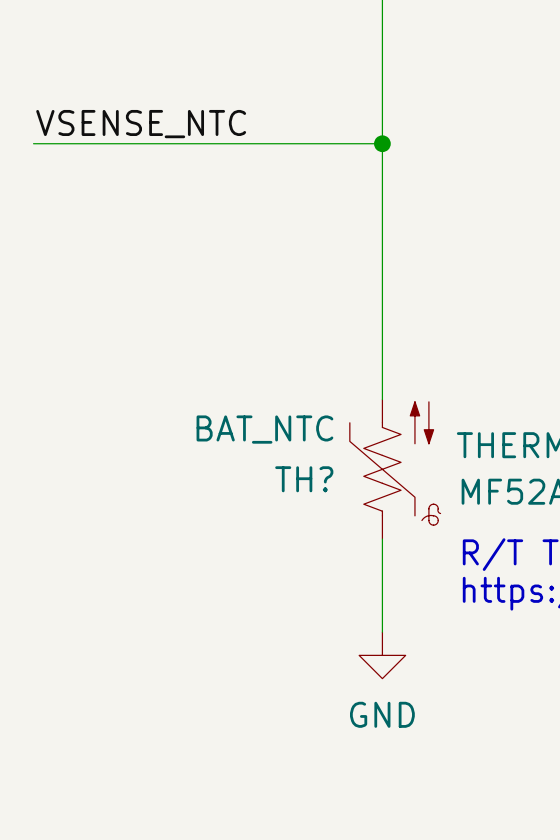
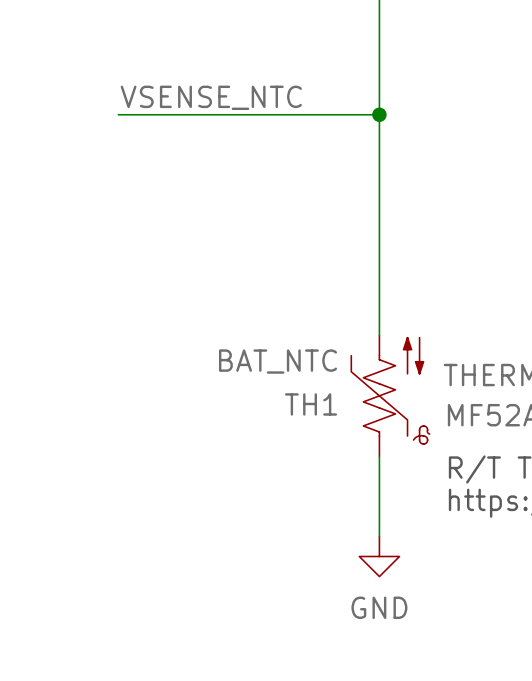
label position: VSENSE_NTC (141, 124) -> VSENSE_NTC (211, 97)
wire: (33, 143) (80, 143) -> none
TH? name: TH? (304, 479) -> TH1 (311, 404)

